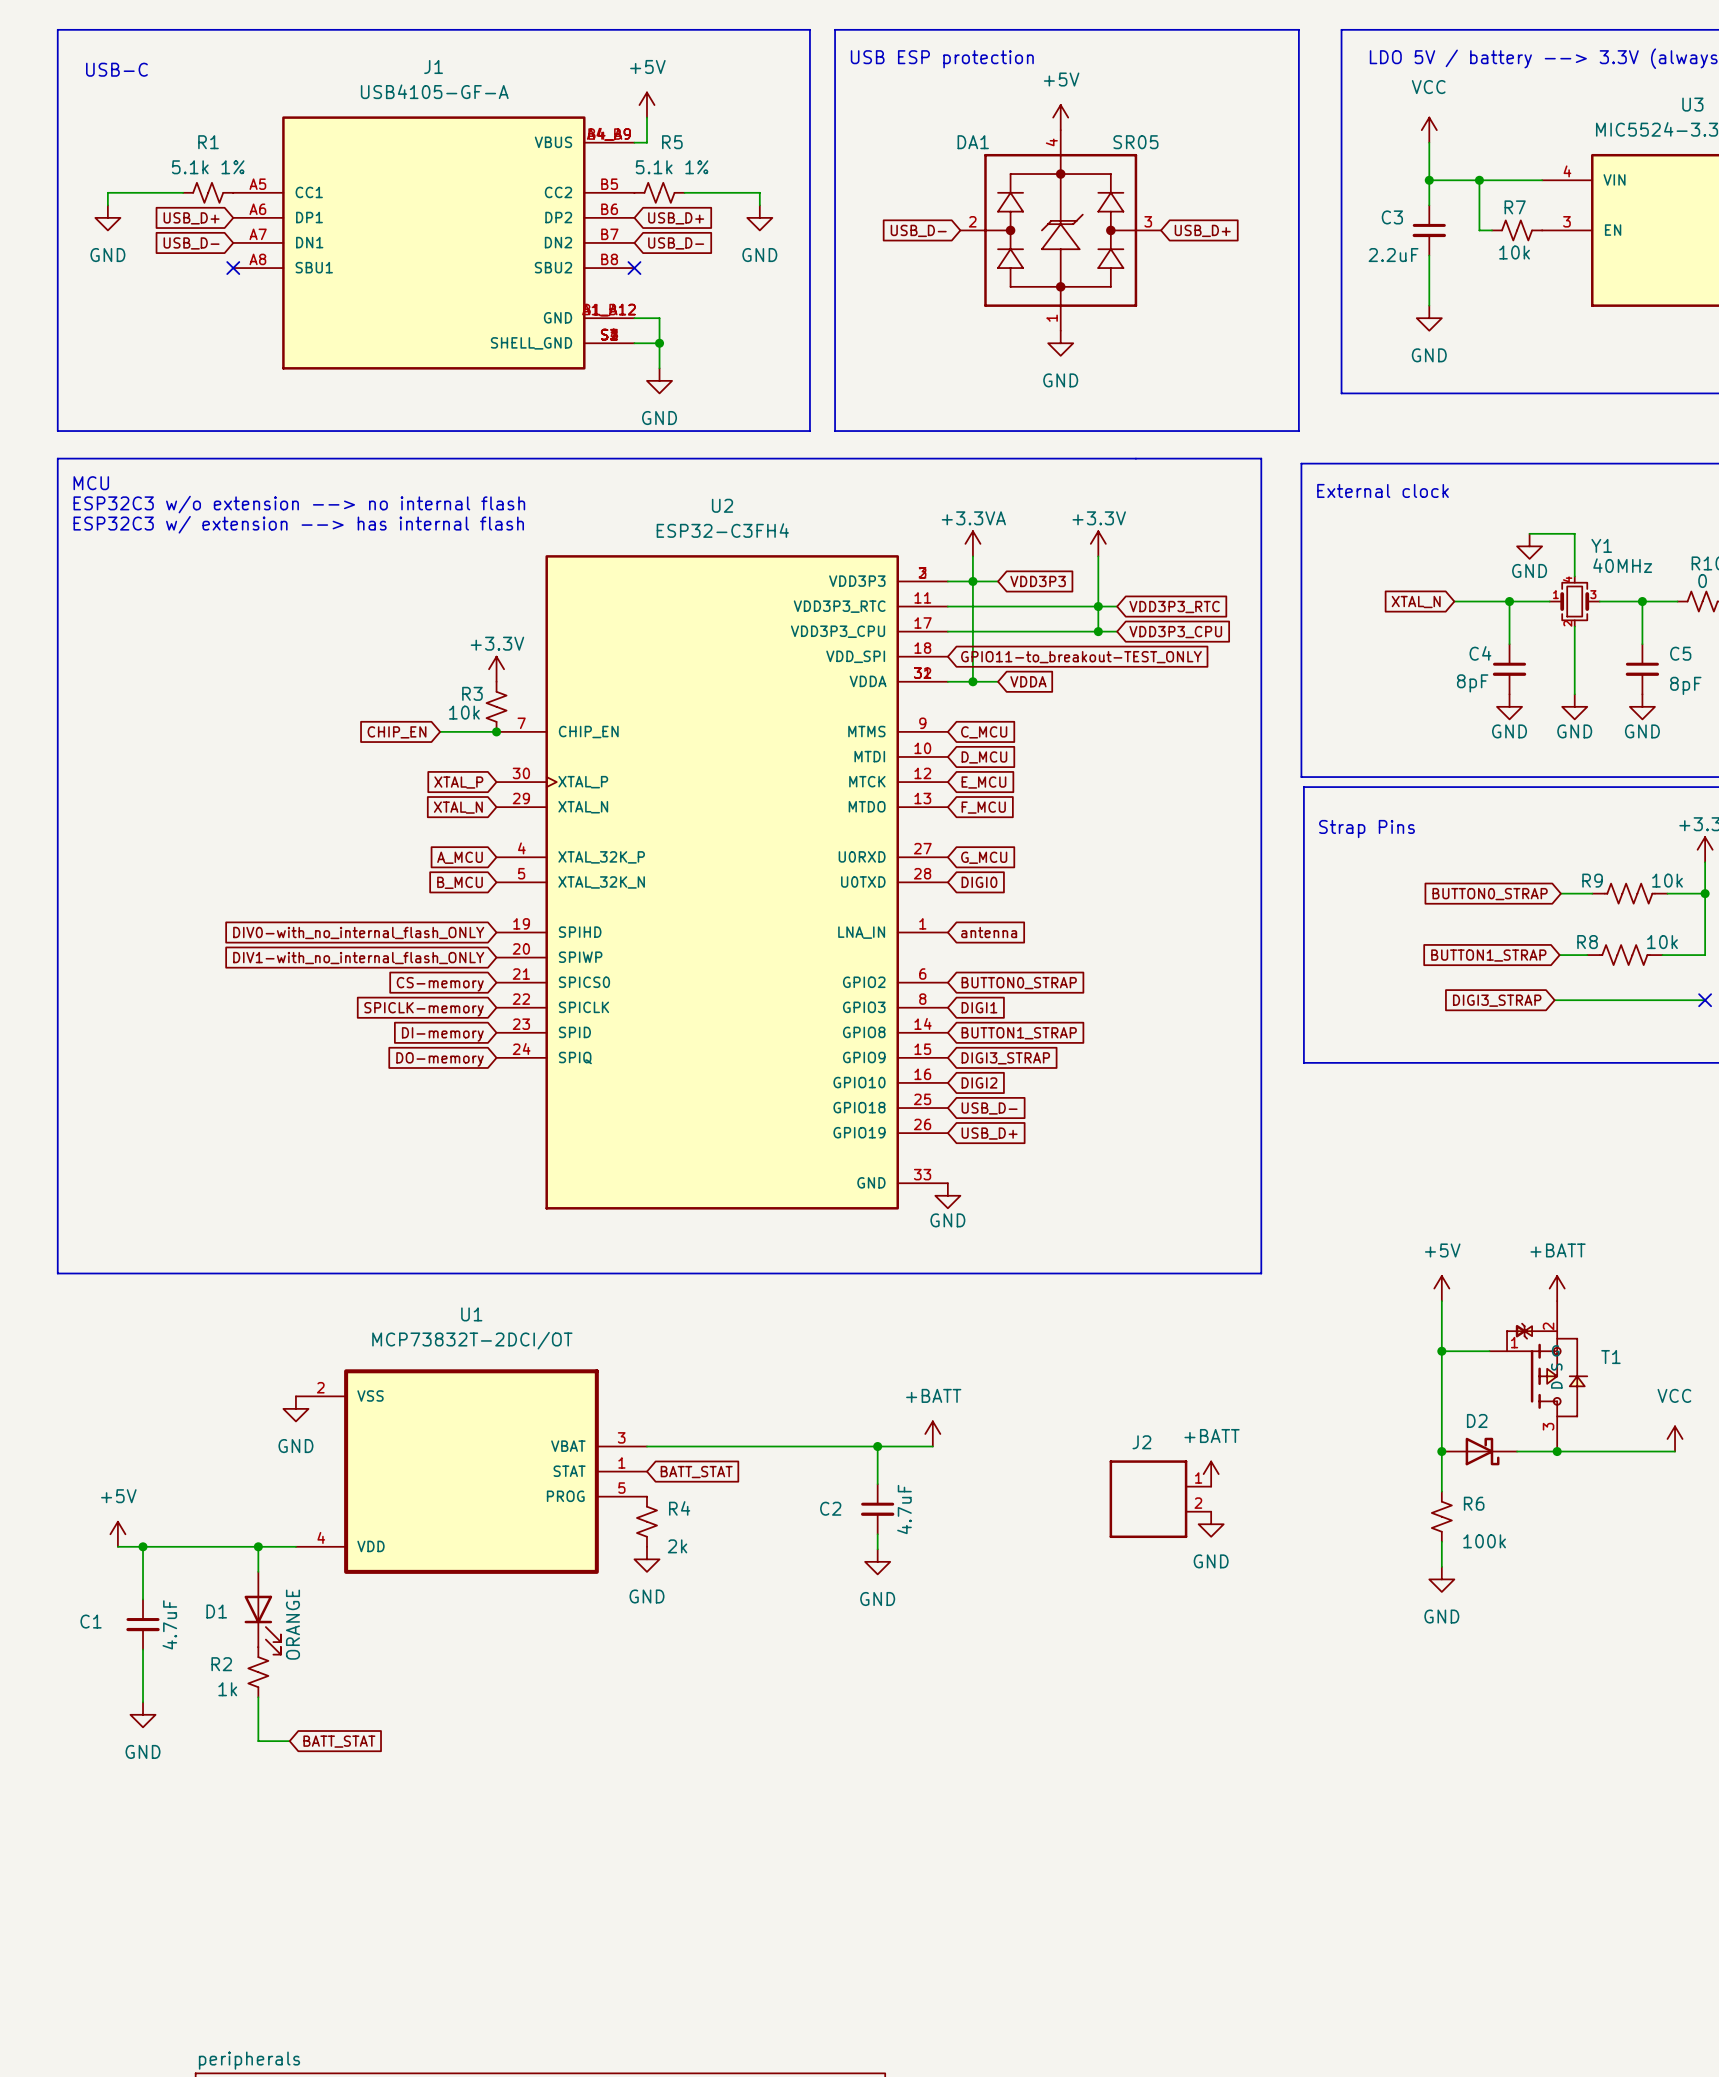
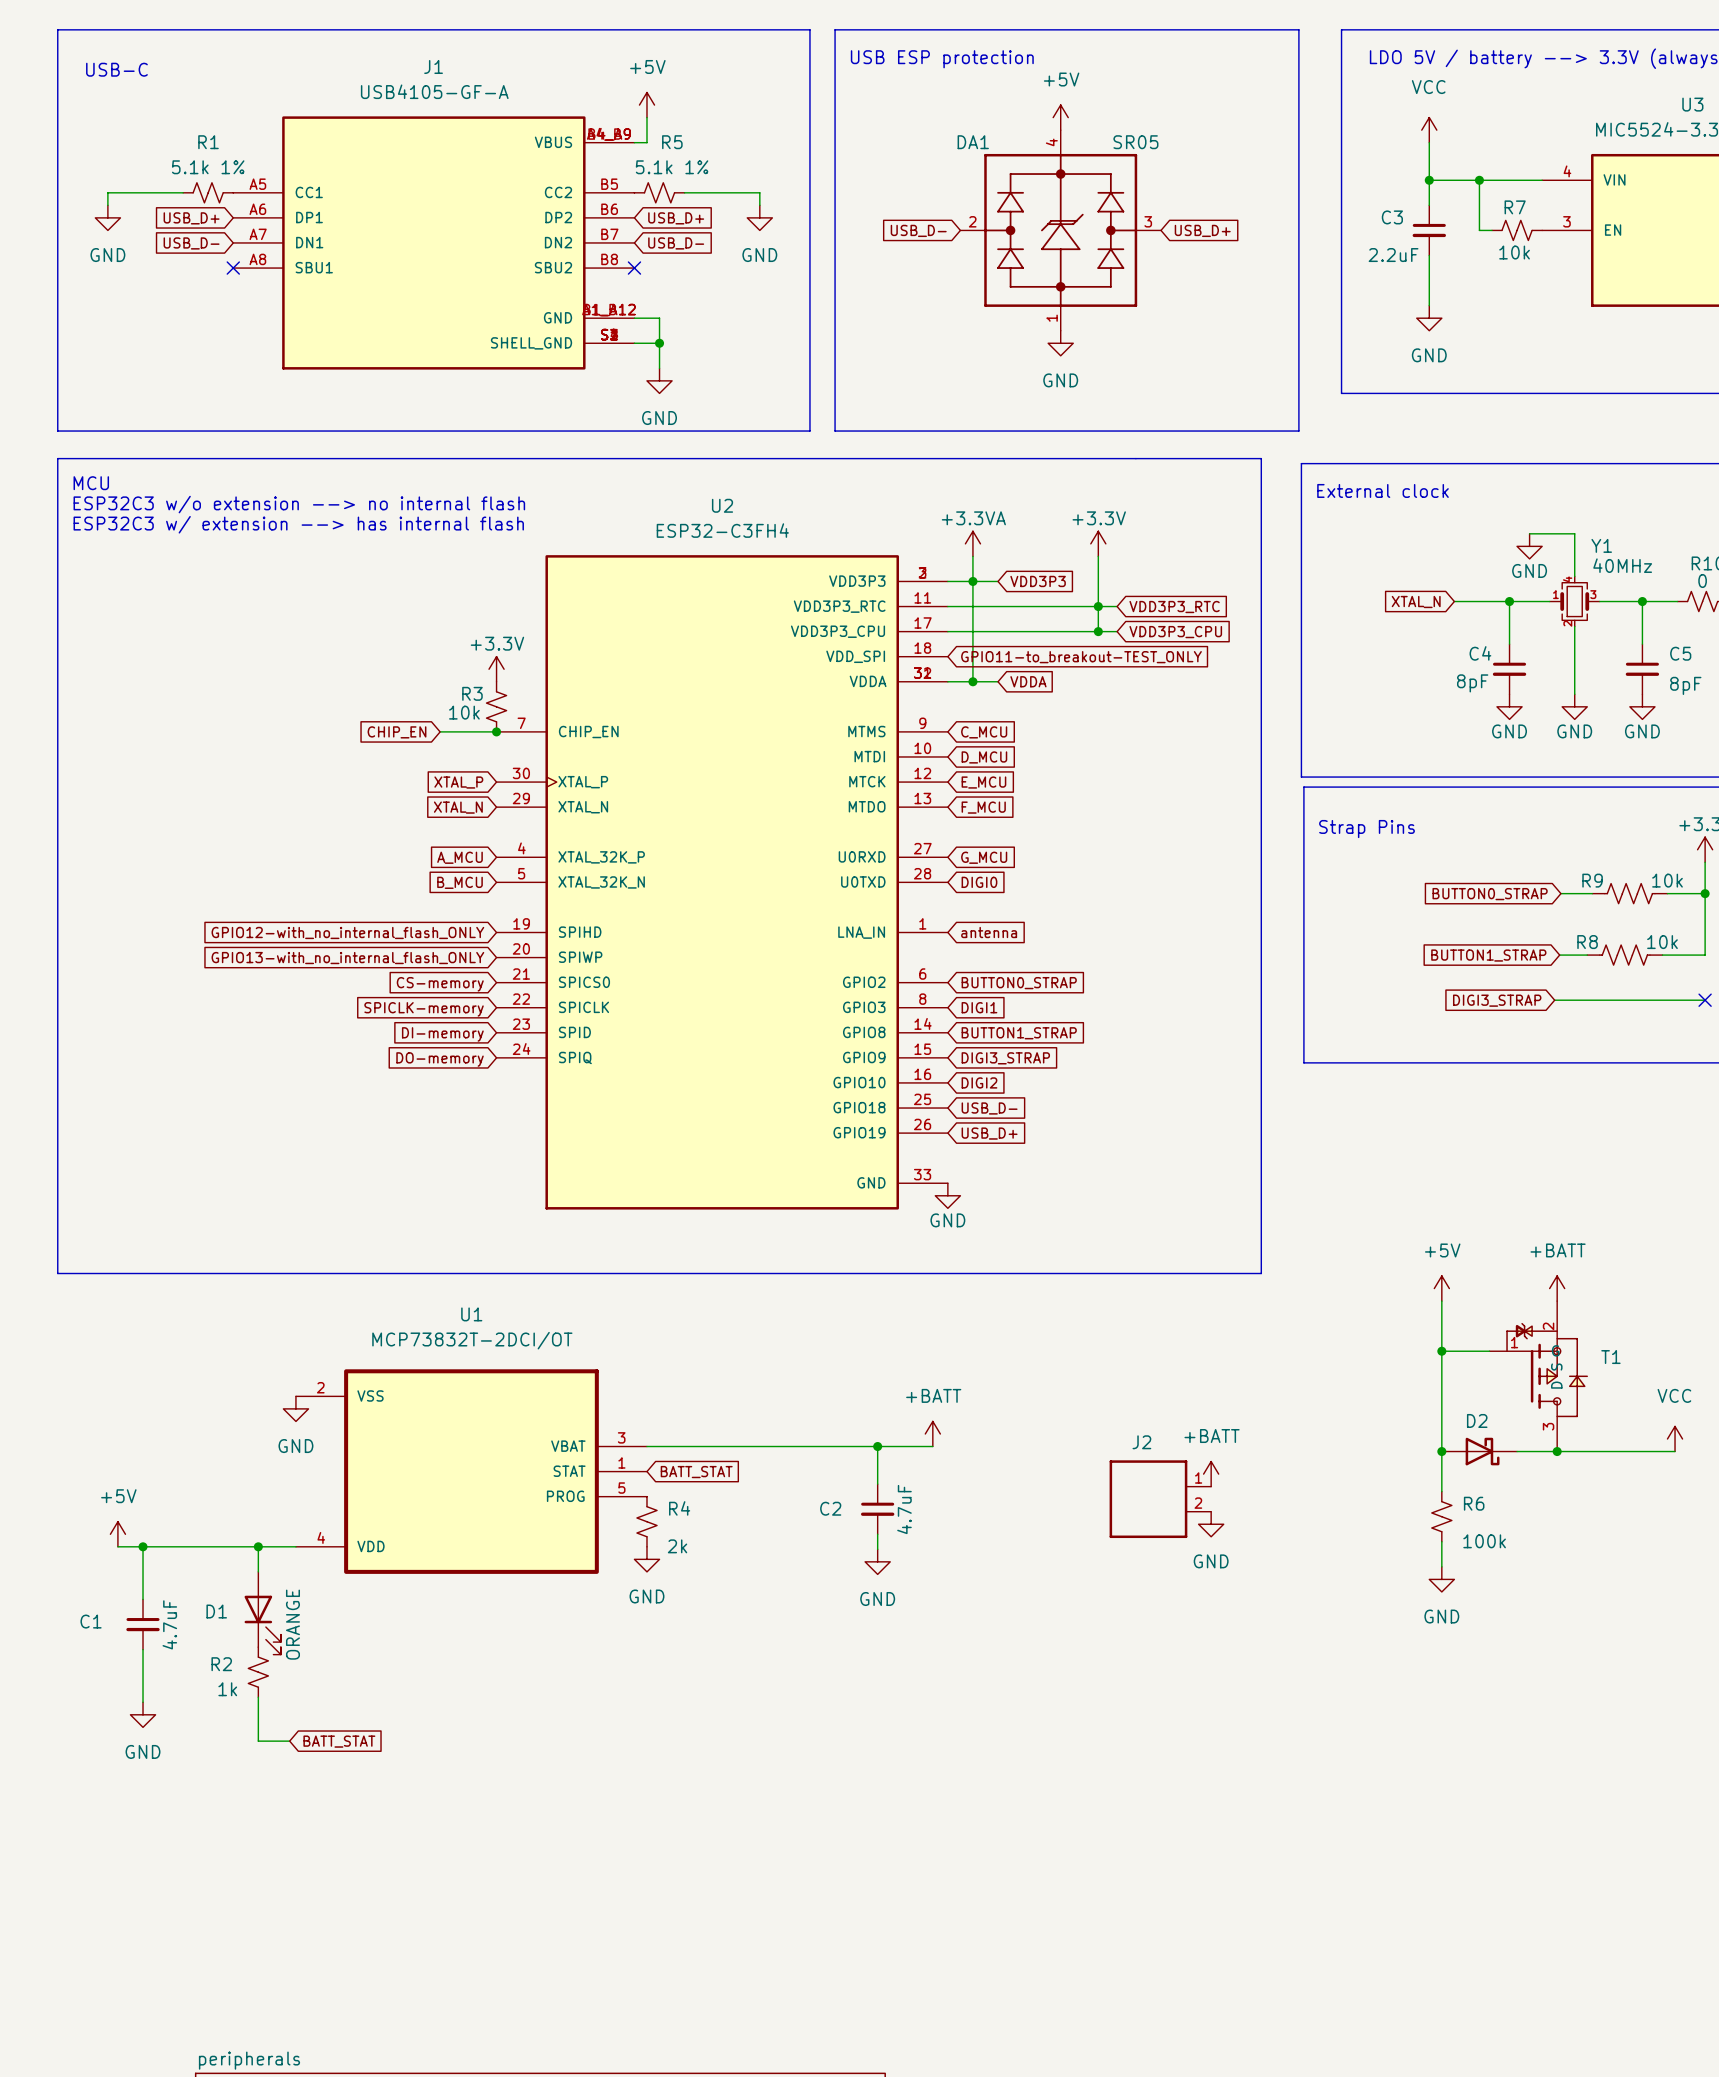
global label: DIV0-with_no_internal_flash_ONLY (358, 932) -> GPIO12-with_no_internal_flash_ONLY (347, 932)
global label: DIV1-with_no_internal_flash_ONLY (358, 958) -> GPIO13-with_no_internal_flash_ONLY (347, 958)

